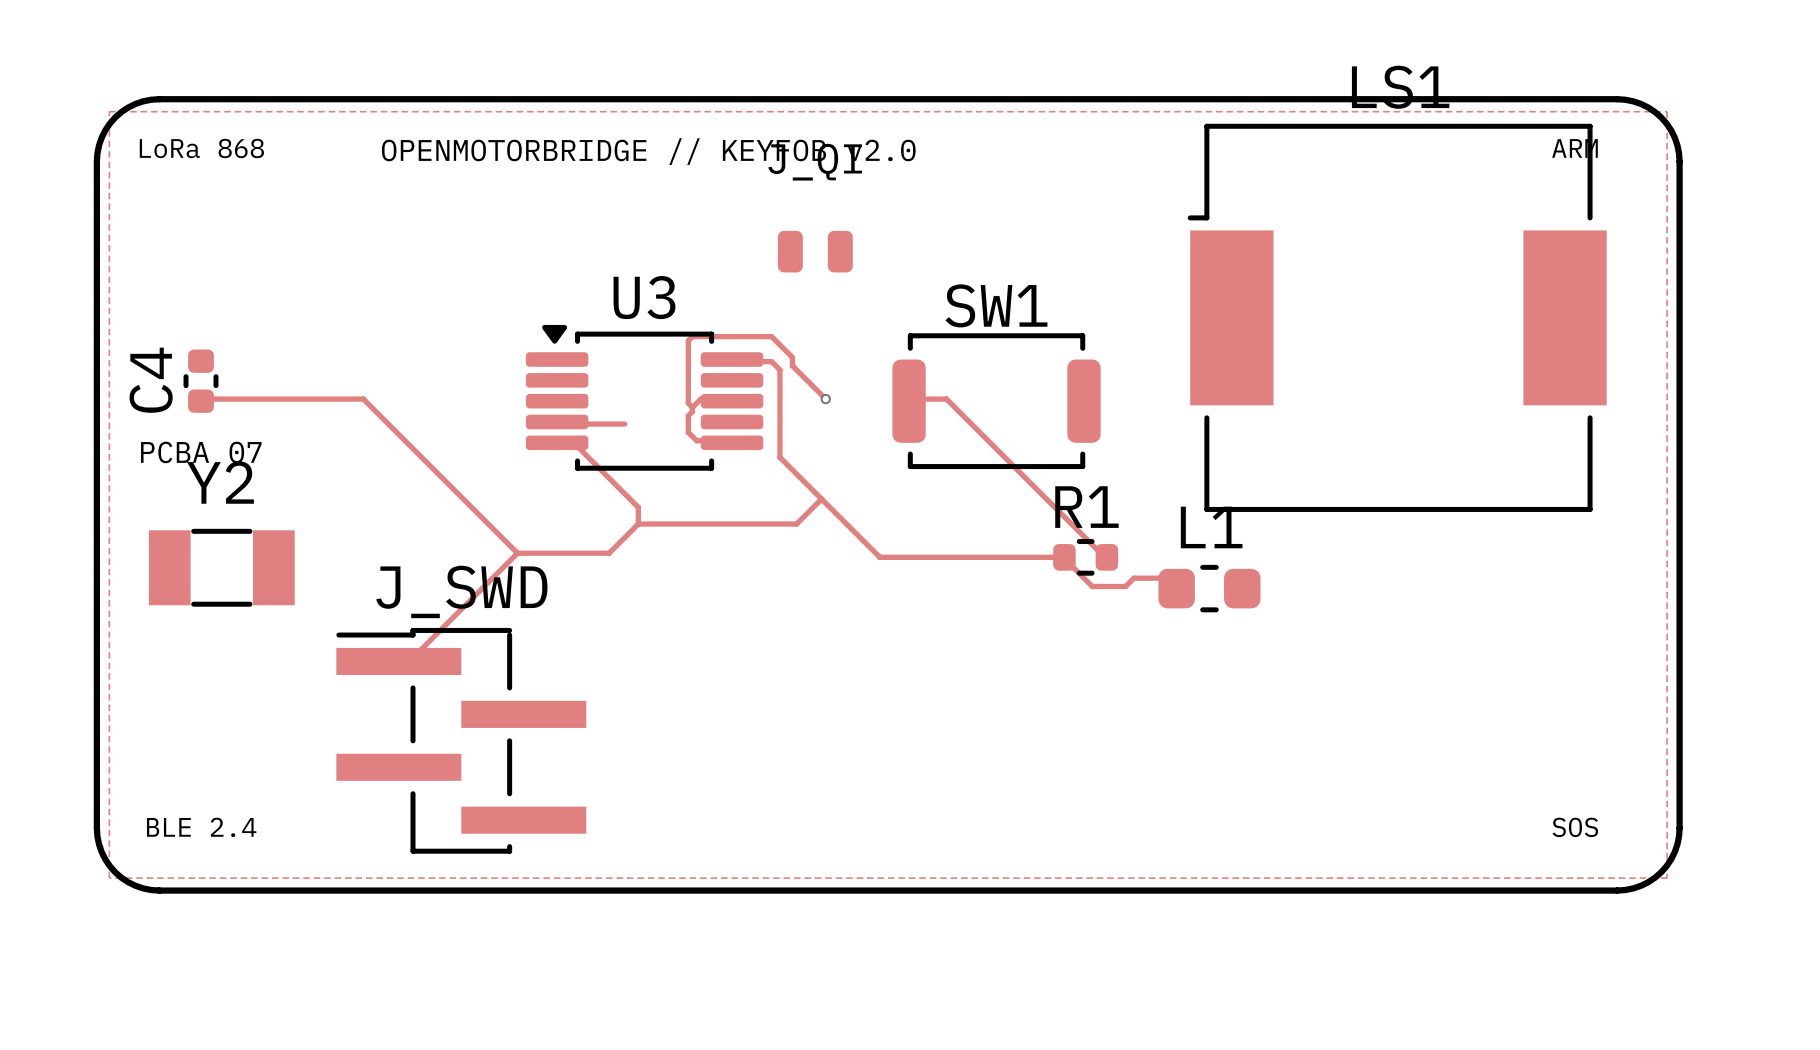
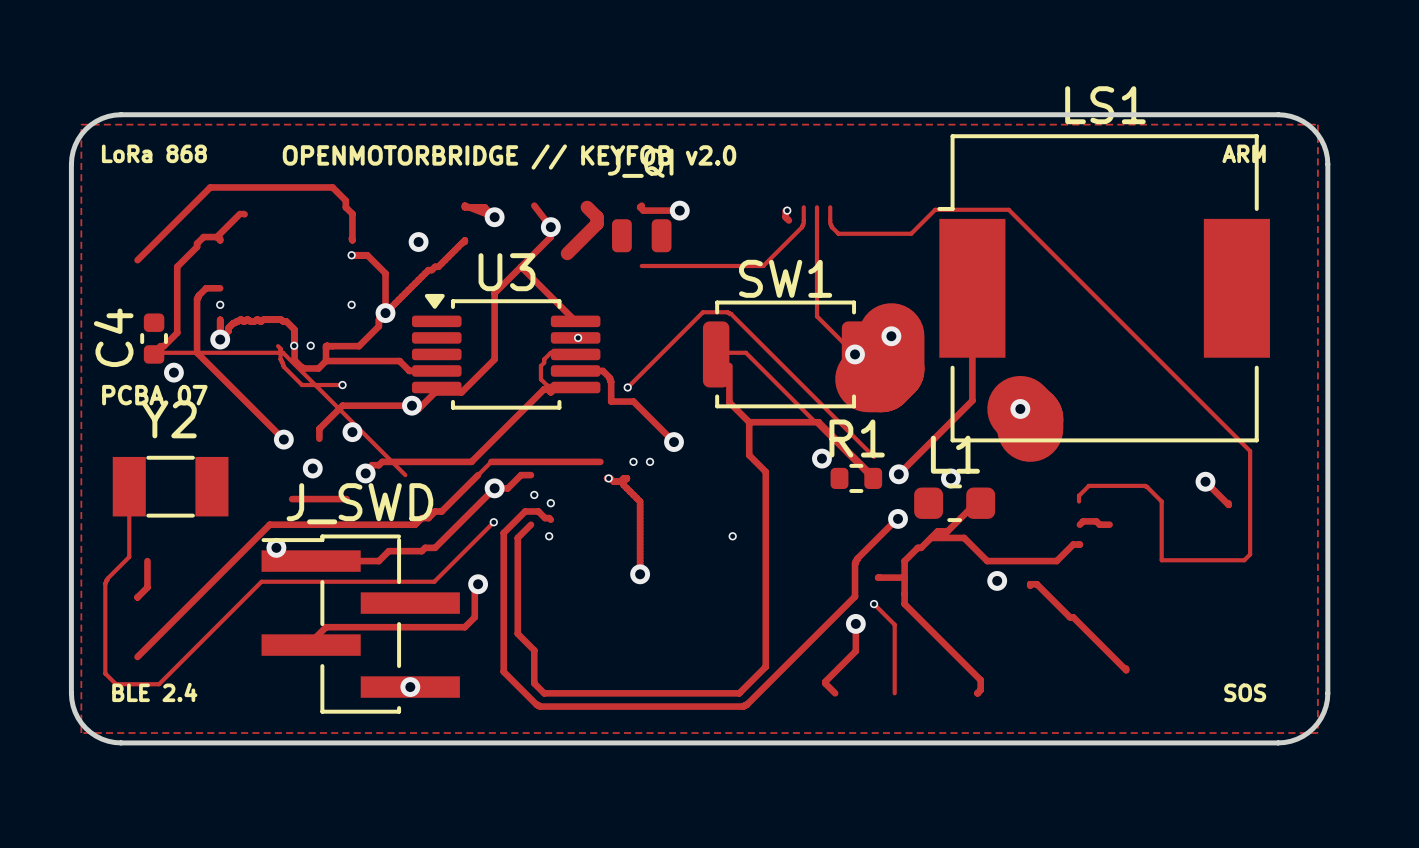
track: none -> (464, 205) (464, 207) (484, 207) (494, 217) (464, 205)
track: none -> (534, 205) (550, 227) (550, 237) (494, 293) (494, 359) (461, 392) (435, 392) (418, 408) (415, 408)
track: none -> (641, 205) (640, 207) (643, 210) (679, 210)
track: none -> (587, 207) (597, 217) (597, 223) (567, 253)
track: none -> (803, 207) (803, 223)
track: none -> (817, 207) (817, 316) (855, 354)
track: none -> (830, 207) (830, 223)
via: none -> (679, 210)
track: none -> (785, 210) (785, 217) (788, 220)
via: none -> (787, 210)
track: none -> (240, 213) (216, 237)
track: none -> (243, 213) (244, 214)
via: none -> (494, 217)
track: none -> (802, 224) (763, 265) (641, 265)
track: none -> (831, 224) (838, 233) (911, 233) (935, 209) (1008, 209) (1250, 451) (1250, 554) (1244, 560) (1161, 560) (1161, 501) (1145, 485) (1088, 485) (1079, 495) (1079, 501)
via: none -> (550, 227)
track: none -> (216, 237) (220, 240) (220, 238)
track: none -> (216, 237) (203, 237) (197, 243) (197, 246) (177, 266) (177, 332) (163, 346) (160, 346) (154, 354)
track: none -> (351, 238) (352, 240) (352, 213) (345, 207) (345, 200) (332, 187) (210, 187) (137, 260)
via: none -> (418, 242)
track: none -> (464, 242) (464, 240) (438, 266) (428, 270) (378, 319) (378, 326) (359, 346) (327, 345)
track: none -> (351, 255) (367, 255) (385, 273) (385, 313)
via: none -> (351, 255)
track: none -> (521, 266) (573, 319)
track: none -> (220, 288) (206, 288) (197, 299) (197, 352) (283, 439)
track: none -> (972, 288) (972, 400) (898, 474)
via: none -> (220, 304)
via: none -> (351, 304)
via: none -> (385, 313)
track: none -> (220, 319) (220, 339) (228, 331) (228, 327) (240, 319) (243, 321) (246, 319) (249, 321) (256, 319) (286, 321) (294, 329) (294, 360) (302, 367) (318, 368) (326, 361)
track: (732, 359) (734, 361) (771, 361) (779, 369) (779, 457) (879, 557) (1063, 557) (1092, 586) (1125, 586) (1133, 578) (1163, 578) (1175, 590) -> none
track: none -> (868, 336) (891, 336) (891, 369) (881, 379) (868, 379)
via: none -> (891, 336)
via: none -> (578, 337)
via: none -> (220, 339)
track: none -> (278, 346) (280, 348) (280, 359) (283, 366) (302, 385) (342, 385)
via: none -> (294, 345)
via: none -> (310, 345)
track: none -> (327, 346) (326, 361)
track: (825, 399) (792, 365) (792, 357) (771, 336) (692, 336) (688, 340) (688, 403) (692, 407) -> none
via: (825, 399) -> none
via: none -> (855, 354)
track: none -> (729, 366) (729, 402) (749, 422)
track: (557, 421) (555, 424) (624, 424) -> (436, 370) (409, 370) (399, 361) (326, 361)
track: none -> (575, 370) (602, 370) (611, 381) (611, 401) (633, 401) (674, 442)
via: none -> (173, 372)
via: none -> (342, 385)
track: (557, 442) (555, 440) (571, 440) (638, 507) (638, 524) -> none
track: none -> (627, 387) (702, 312) (727, 312) (874, 456)
via: none -> (627, 387)
track: none -> (570, 389) (554, 389) (550, 392) (544, 389) (471, 461) (382, 461) (378, 465) (372, 465) (365, 473)
track: none -> (411, 405) (342, 405) (319, 428) (319, 438)
via: none -> (411, 405)
track: none -> (1020, 408) (1030, 418) (1030, 428)
via: none -> (1020, 408)
track: none -> (749, 422) (818, 422) (873, 478)
track: none -> (749, 422) (749, 455) (765, 471) (765, 666) (739, 693) (544, 693) (534, 683) (534, 650) (517, 633) (517, 537) (531, 524)
via: none -> (352, 432)
track: (821, 499) (796, 524) (638, 524) -> none
via: none -> (283, 439)
via: none -> (674, 442)
track: (638, 524) (625, 536) -> (600, 461) (491, 461)
via: none -> (821, 458)
via: none -> (633, 461)
via: none -> (650, 461)
via: none -> (312, 468)
via: none -> (365, 473)
via: none -> (898, 474)
track: (609, 553) (517, 553) (409, 661) -> (531, 475) (521, 475) (507, 488) (494, 488) (435, 547) (425, 547) (421, 551) (388, 551) (378, 561) (319, 561)
track: none -> (478, 475) (441, 511) (435, 511) (428, 518) (421, 518) (415, 524) (269, 524) (137, 656)
track: none -> (607, 478) (613, 481) (620, 481) (626, 478) (623, 485) (640, 501) (640, 571) (641, 569)
via: none -> (608, 478)
via: none -> (950, 478)
track: none -> (1205, 481) (1228, 504) (1228, 503)
via: none -> (1205, 481)
track: none -> (129, 486) (129, 556) (105, 583) (105, 673) (116, 684) (159, 684) (261, 581) (434, 581) (493, 522)
via: none -> (494, 488)
via: none -> (534, 494)
track: none -> (292, 499) (346, 499)
via: none -> (550, 503)
track: none -> (980, 503) (980, 504) (974, 504) (947, 531) (937, 531) (904, 561) (904, 604) (980, 680) (980, 690) (978, 693)
track: none -> (897, 518) (855, 561) (855, 596) (743, 706) (540, 706) (536, 704) (503, 671) (503, 532) (525, 511) (538, 511) (545, 518) (550, 519)
via: none -> (898, 518)
via: none -> (493, 522)
track: none -> (1079, 524) (1083, 521) (1096, 521) (1099, 524) (1109, 524)
via: none -> (549, 536)
via: none -> (732, 536)
track: none -> (931, 537) (964, 537) (987, 561) (1056, 561) (1073, 544) (1079, 544)
via: none -> (276, 547)
track: none -> (147, 561) (147, 587) (137, 597)
via: none -> (640, 574)
track: none -> (878, 577) (904, 577)
via: none -> (997, 580)
via: none -> (478, 584)
track: none -> (1030, 585) (1030, 584) (1036, 584) (1126, 670) (1126, 668)
track: none -> (474, 587) (474, 617) (464, 627) (326, 627) (309, 643) (311, 645)
track: none -> (874, 604) (894, 624) (894, 693)
via: none -> (874, 604)
track: none -> (855, 623) (855, 651) (825, 681) (835, 693)
via: none -> (855, 623)
via: none -> (410, 687)

